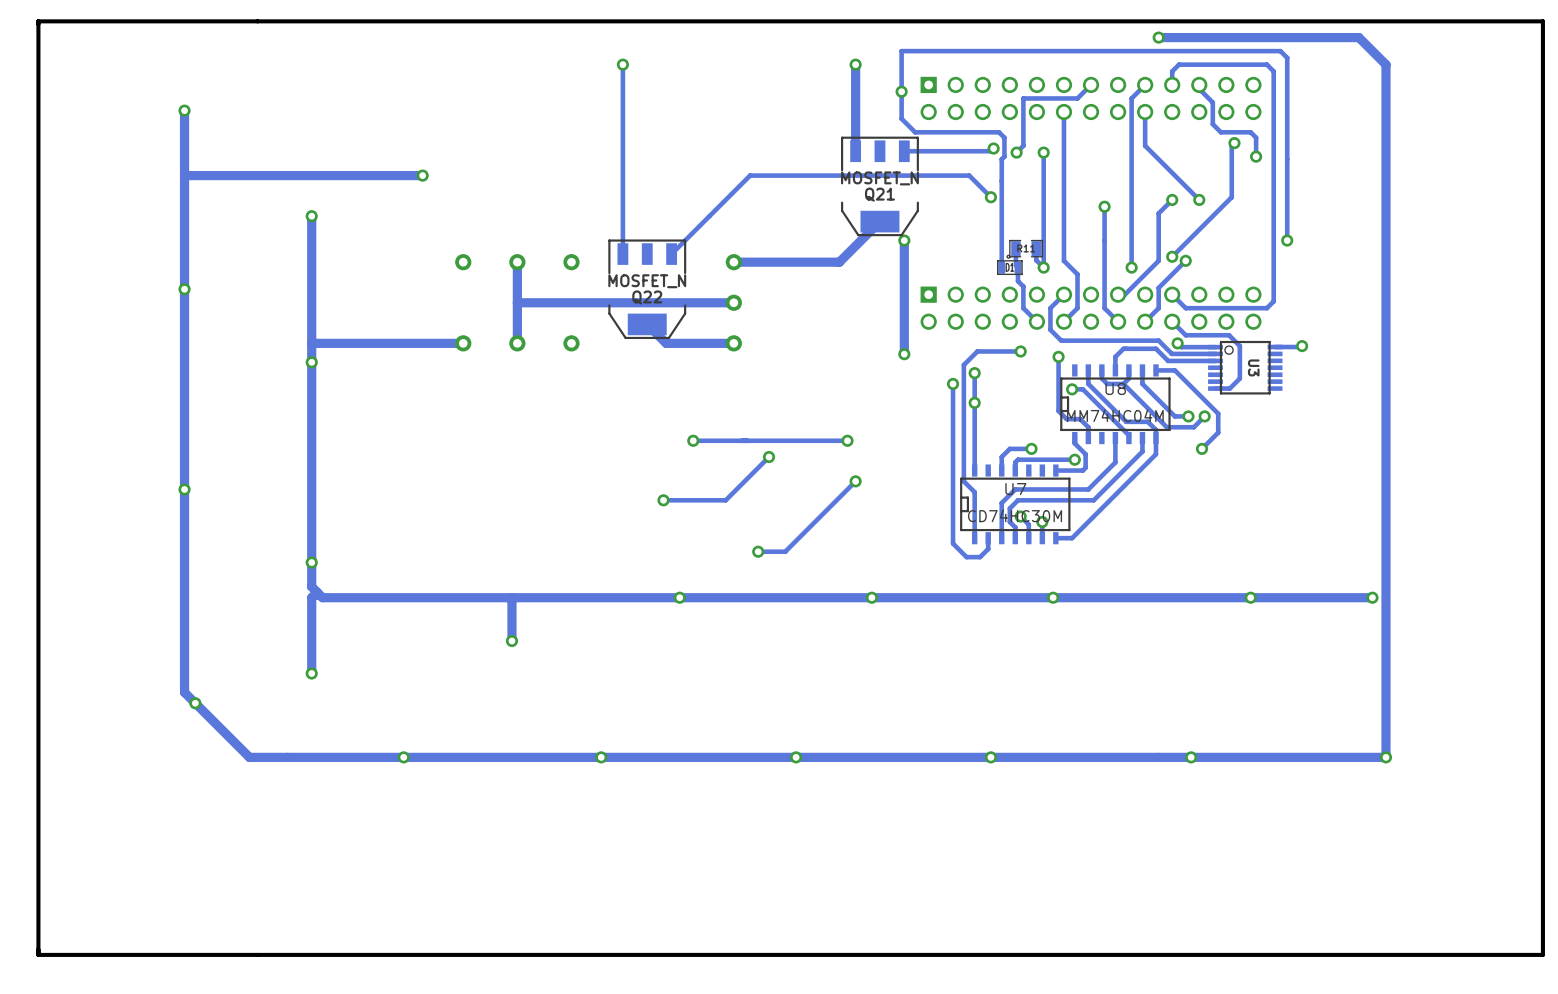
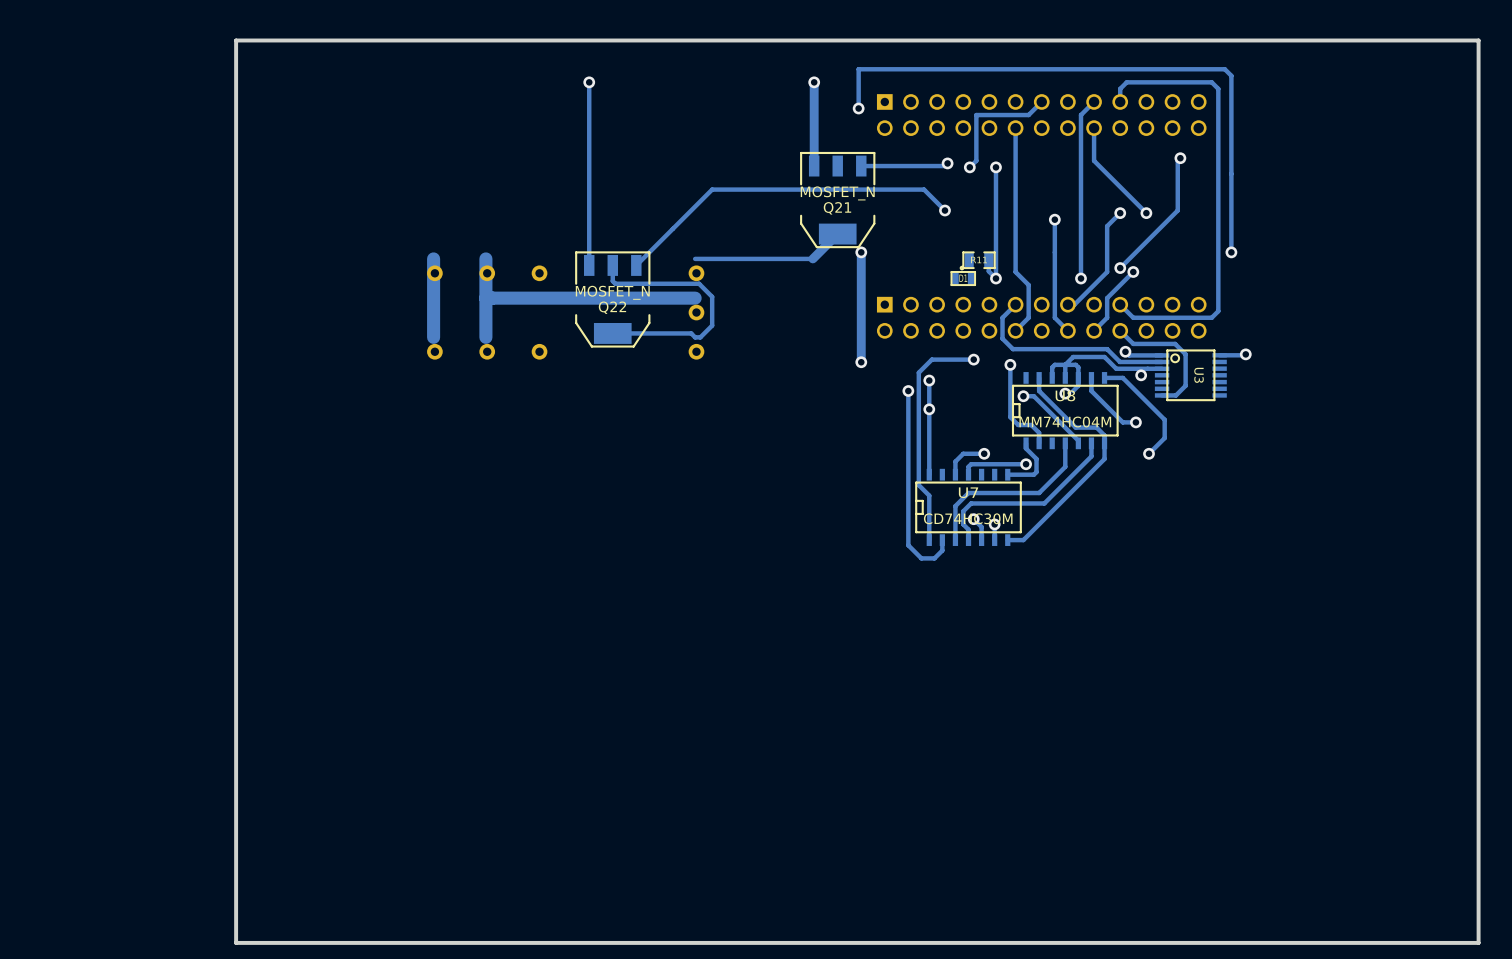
board edge: (257, 21) (38, 21) (38, 954) (257, 954) -> (236, 40) (236, 942)
track: (1158, 37) (1358, 37) (1385, 64) (1385, 757) (249, 757) (184, 692) (184, 110) -> none
via: (1158, 37) -> none
track: (1199, 84) (1199, 89) (1212, 102) (1212, 124) (1220, 132) (1250, 132) (1256, 137) (1256, 156) -> none
track: (901, 91) (901, 118) (915, 132) (999, 132) (1004, 137) (1004, 156) (1001, 159) (1001, 267) -> none
via: (184, 110) -> none
via: (1256, 156) -> none
track: (422, 175) (184, 175) -> none
via: (422, 175) -> none
track: (311, 216) (311, 586) (322, 597) (1372, 597) -> none
via: (311, 216) -> none
track: none -> (433, 258) (433, 337)
track: (854, 247) (839, 262) (733, 262) -> (812, 258) (695, 258)
track: (1015, 248) (1017, 281) (1023, 286) (1023, 308) (1036, 321) -> none
track: (517, 262) (517, 343) -> (485, 258) (485, 337)
via: (184, 289) -> none
track: (733, 302) (517, 302) -> (695, 298) (485, 298)
track: (647, 324) (666, 343) (733, 343) -> (612, 333) (691, 333) (695, 337) (700, 337) (712, 325) (712, 296) (699, 283) (615, 283) (612, 281) (612, 265)
track: (463, 343) (311, 343) -> none
via: (311, 362) -> none
via: none -> (1141, 375)
track: (1101, 370) (1101, 378) (1107, 383) (1123, 383) (1166, 427) (1193, 427) (1204, 416) -> (1052, 377) (1052, 367) (1054, 364) (1075, 364) (1078, 367) (1078, 377)
via: none -> (1065, 393)
via: (1204, 416) -> none
via: (693, 440) -> none
track: (847, 440) (693, 440) -> none
via: (847, 440) -> none
track: (769, 457) (725, 500) (663, 500) -> none
via: (769, 457) -> none
track: (855, 481) (785, 551) (758, 551) -> none
via: (855, 481) -> none
via: (184, 489) -> none
via: (663, 500) -> none
via: (758, 551) -> none
via: (311, 562) -> none
track: (317, 595) (317, 592) (311, 597) (311, 673) -> none
track: (511, 597) (511, 641) -> none
via: (679, 597) -> none
via: (871, 597) -> none
via: (1053, 597) -> none
via: (1250, 597) -> none
via: (1372, 597) -> none
via: (511, 641) -> none
via: (311, 673) -> none
via: (195, 703) -> none
via: (403, 757) -> none
via: (601, 757) -> none
via: (796, 757) -> none
via: (990, 757) -> none
via: (1191, 757) -> none
via: (1385, 757) -> none

